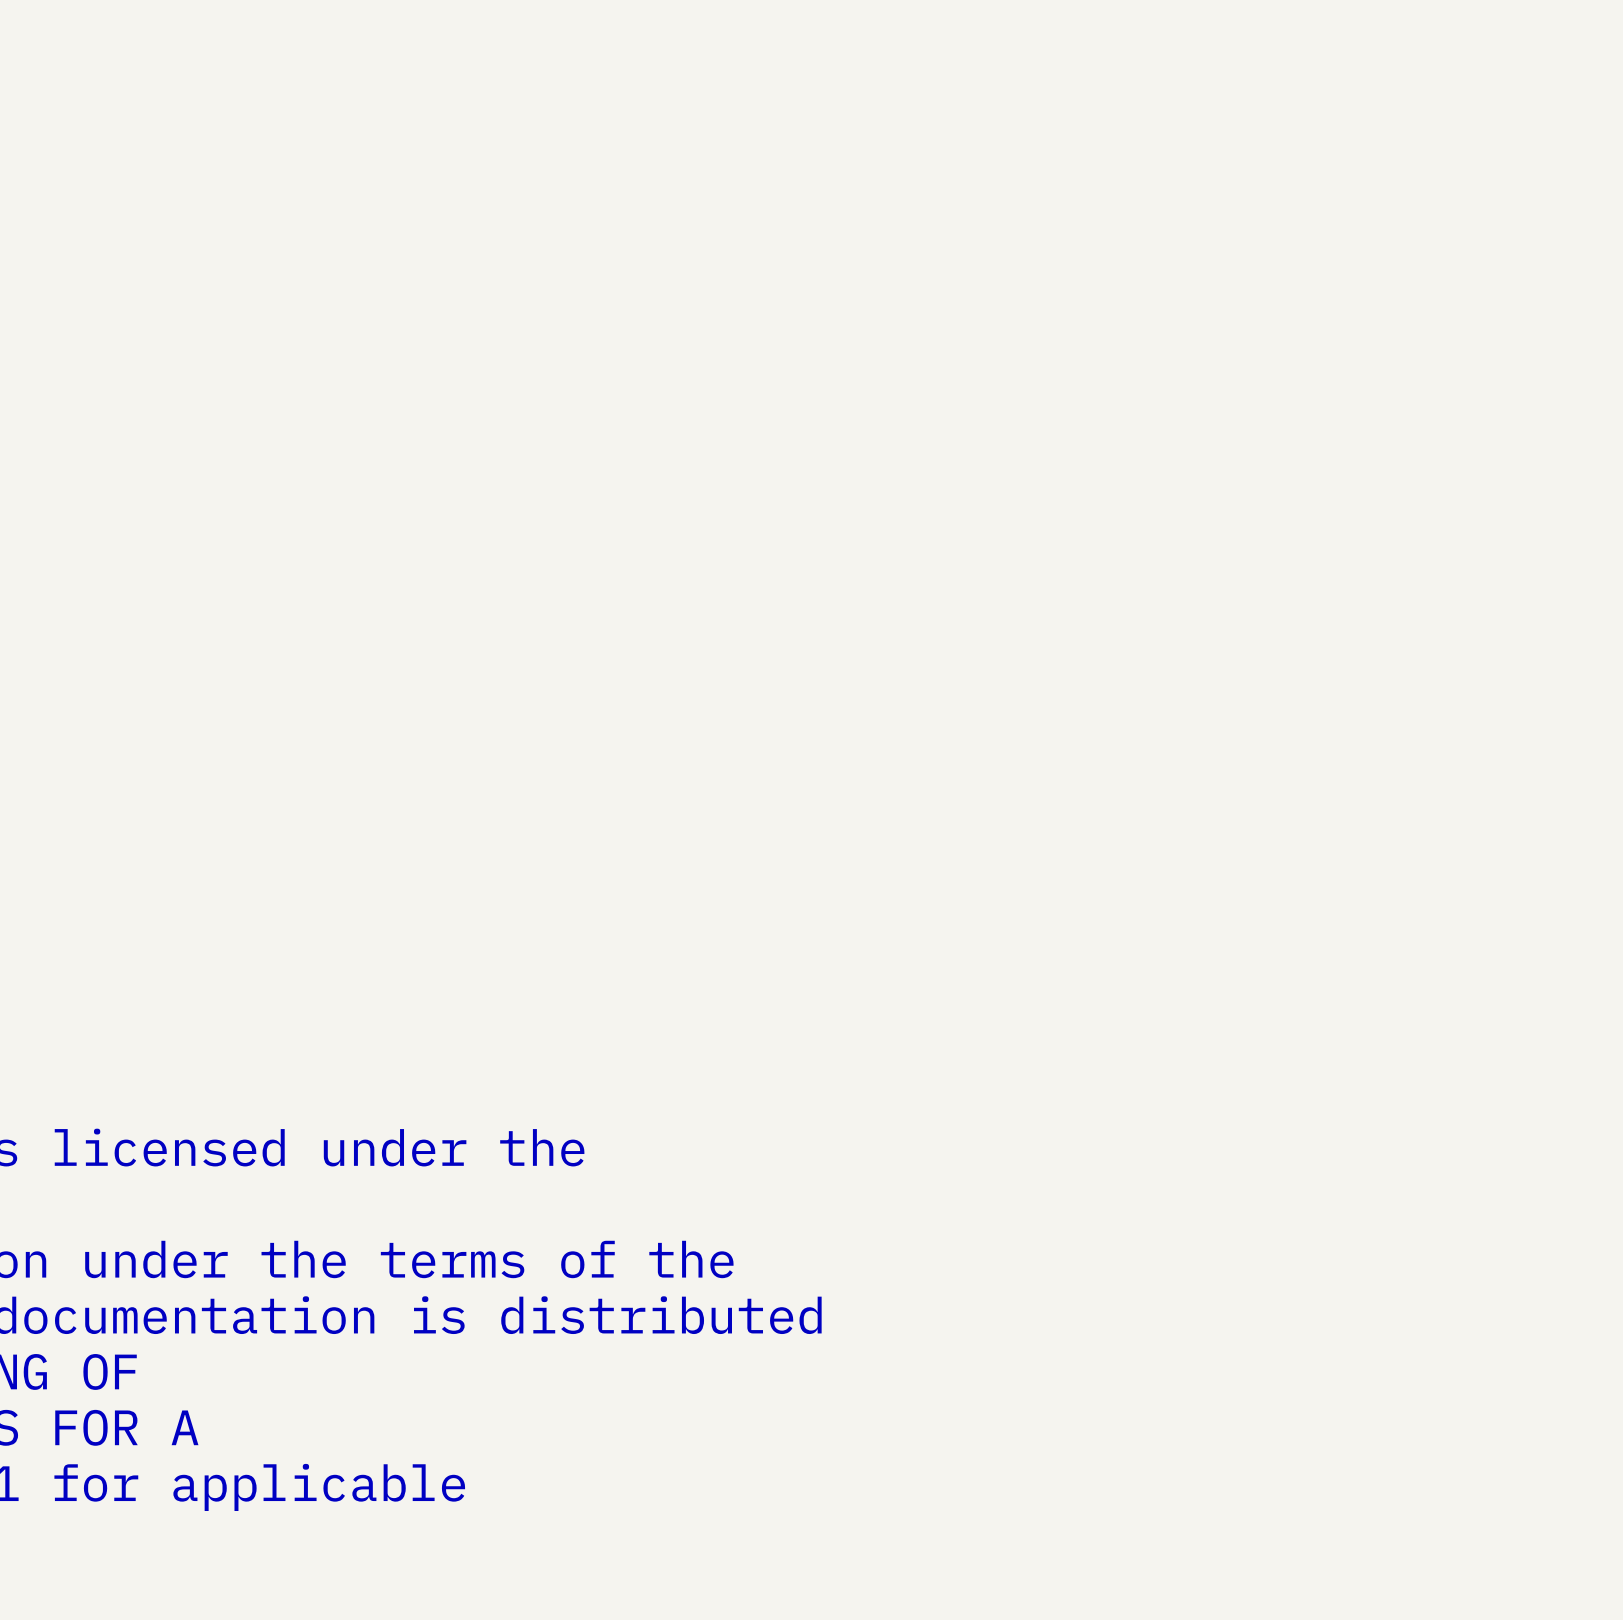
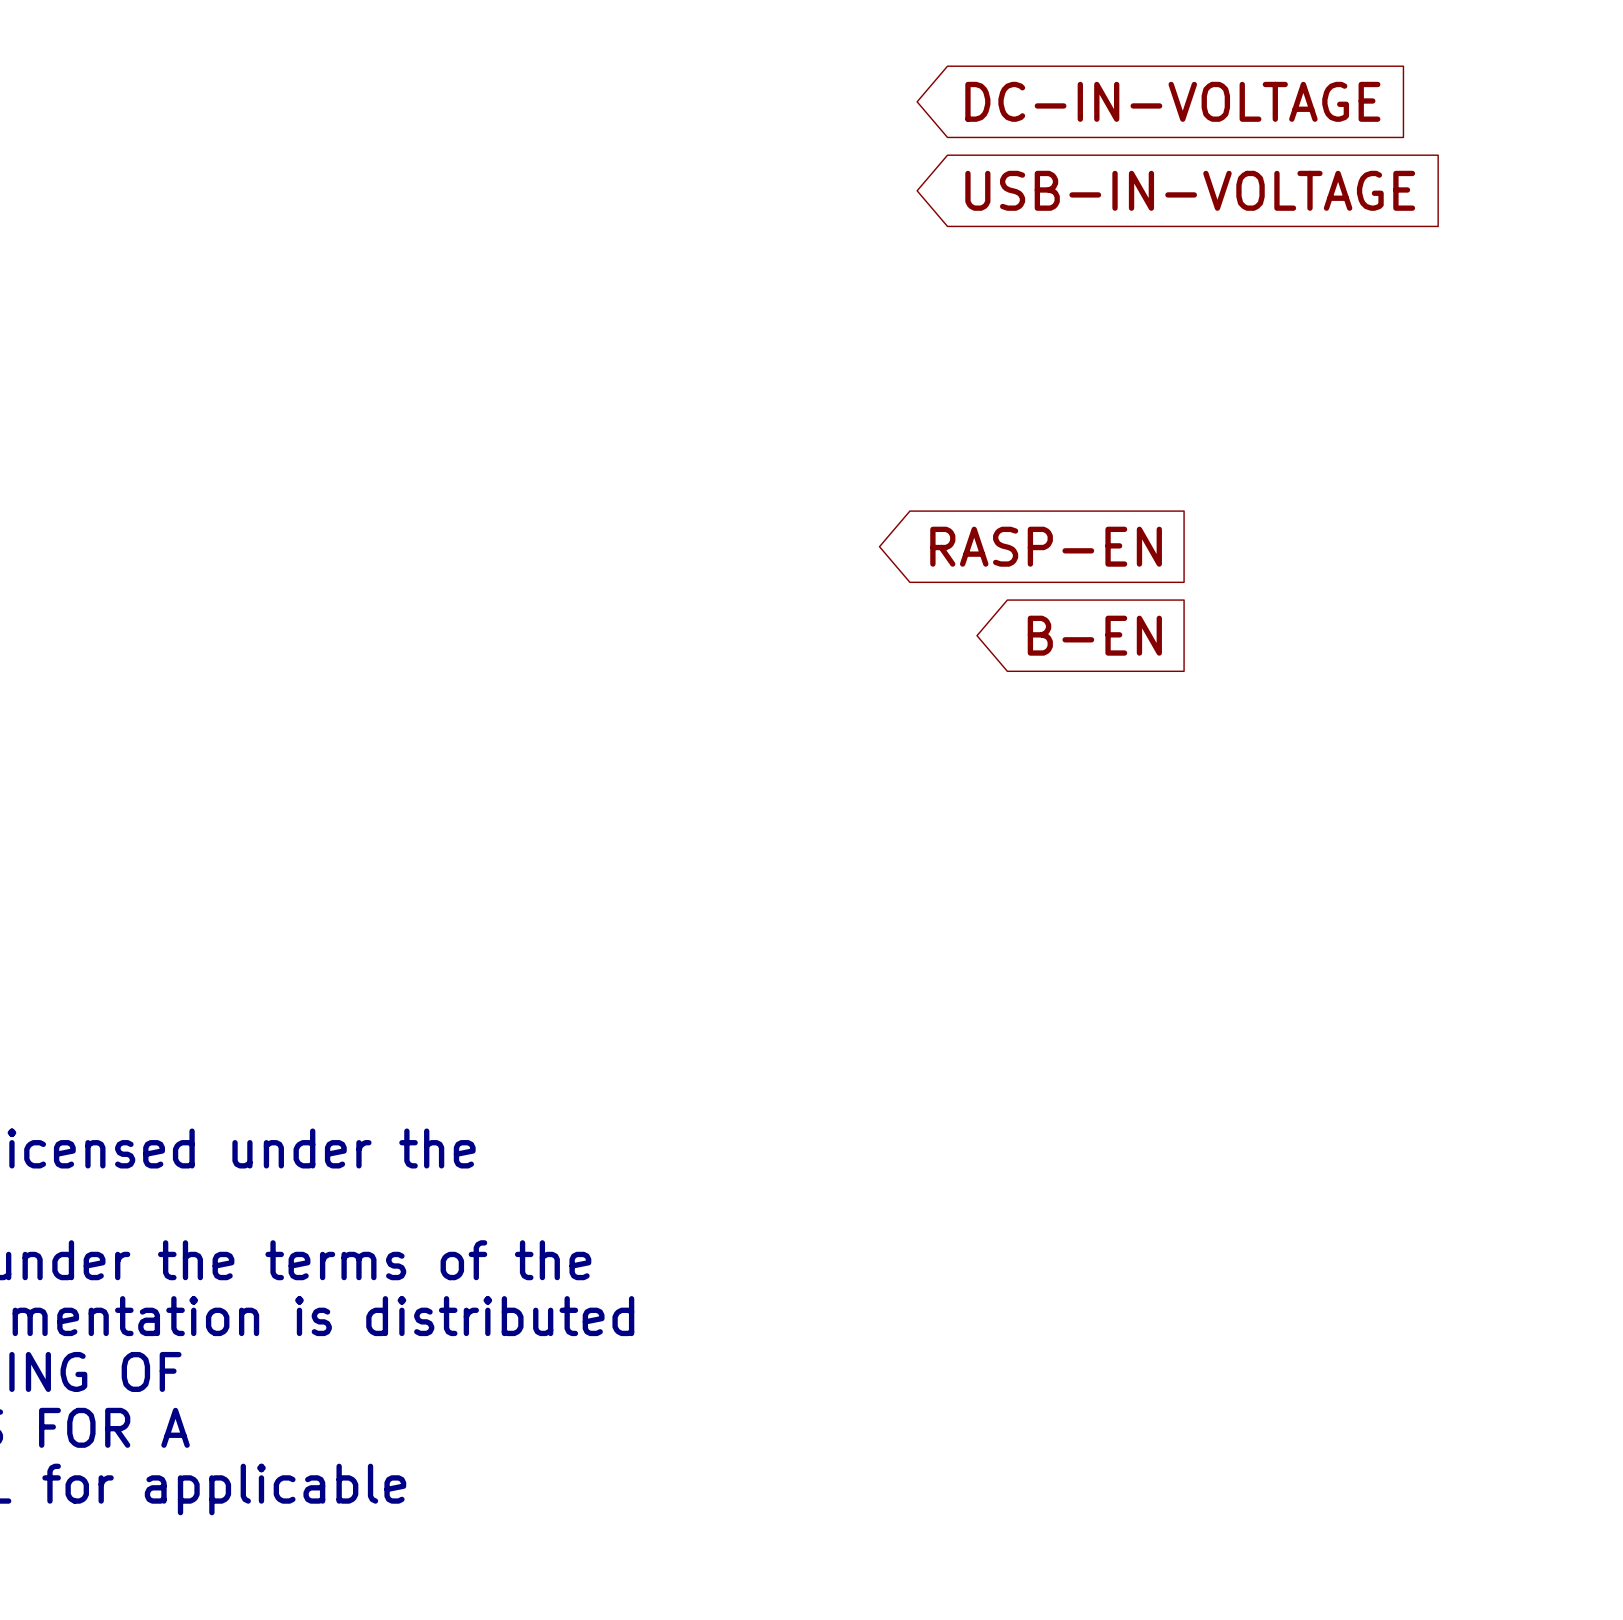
global label: none -> DC-IN-VOLTAGE (1172, 101)
global label: none -> USB-IN-VOLTAGE (1190, 190)
global label: none -> RASP-EN (1046, 546)
global label: none -> B-EN (1094, 635)

